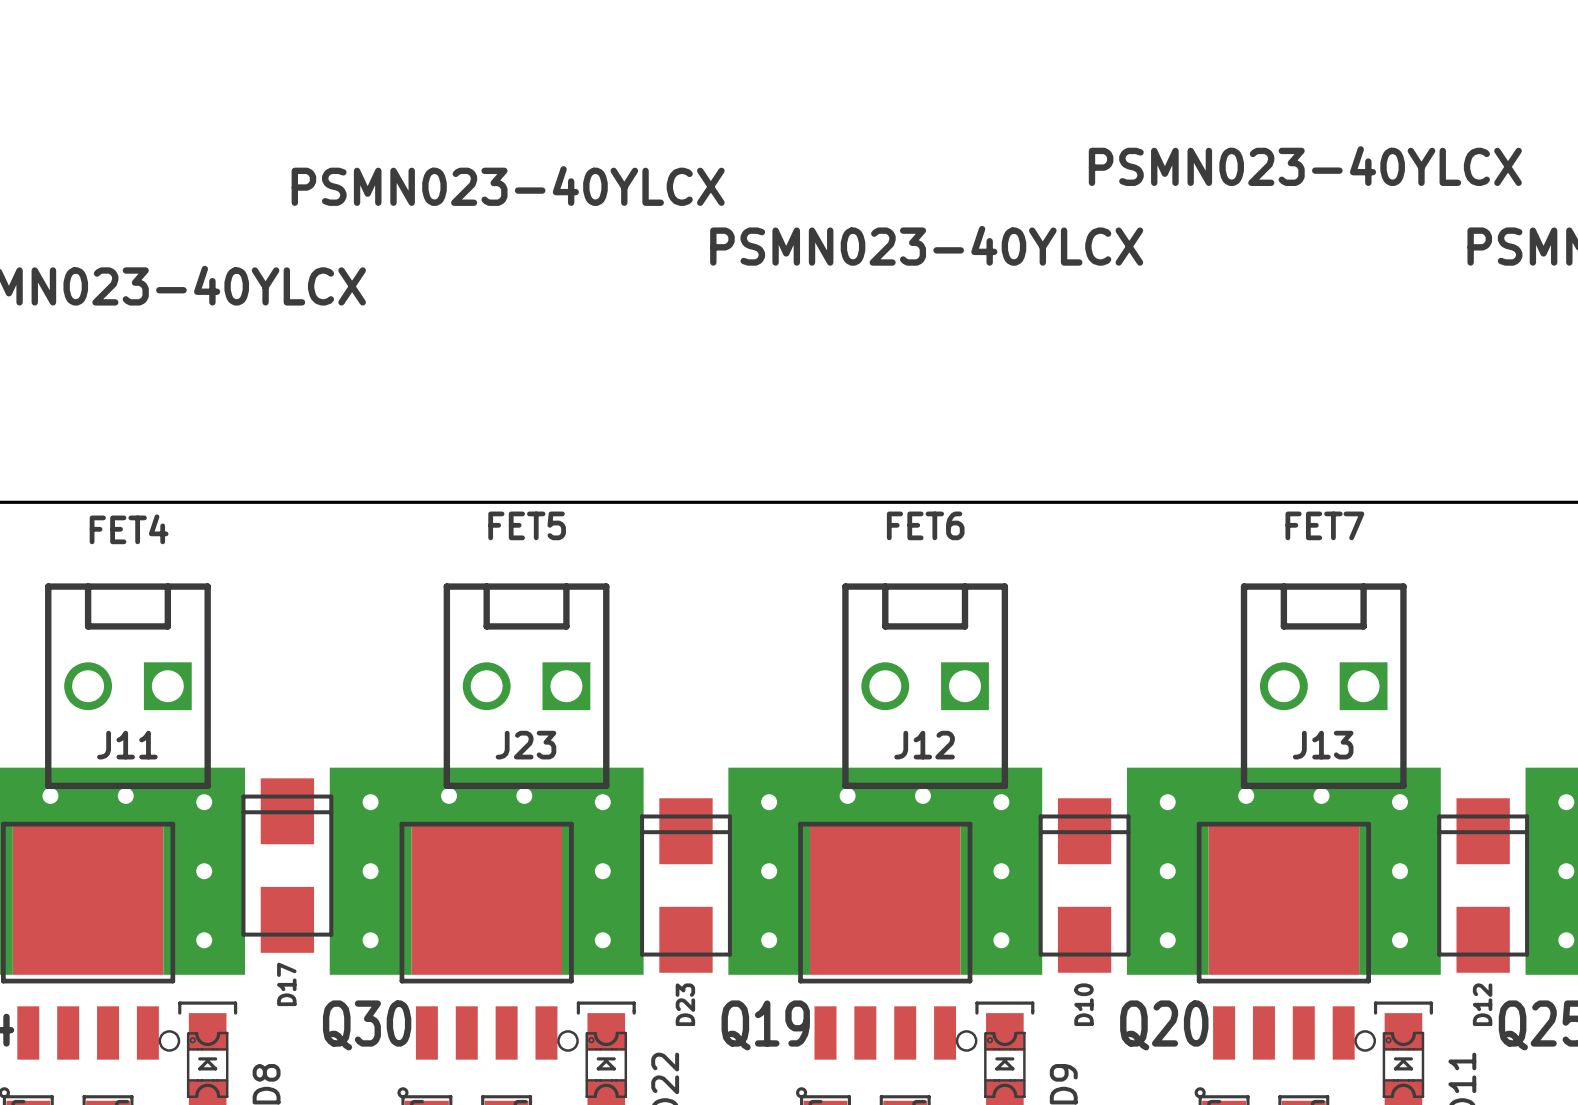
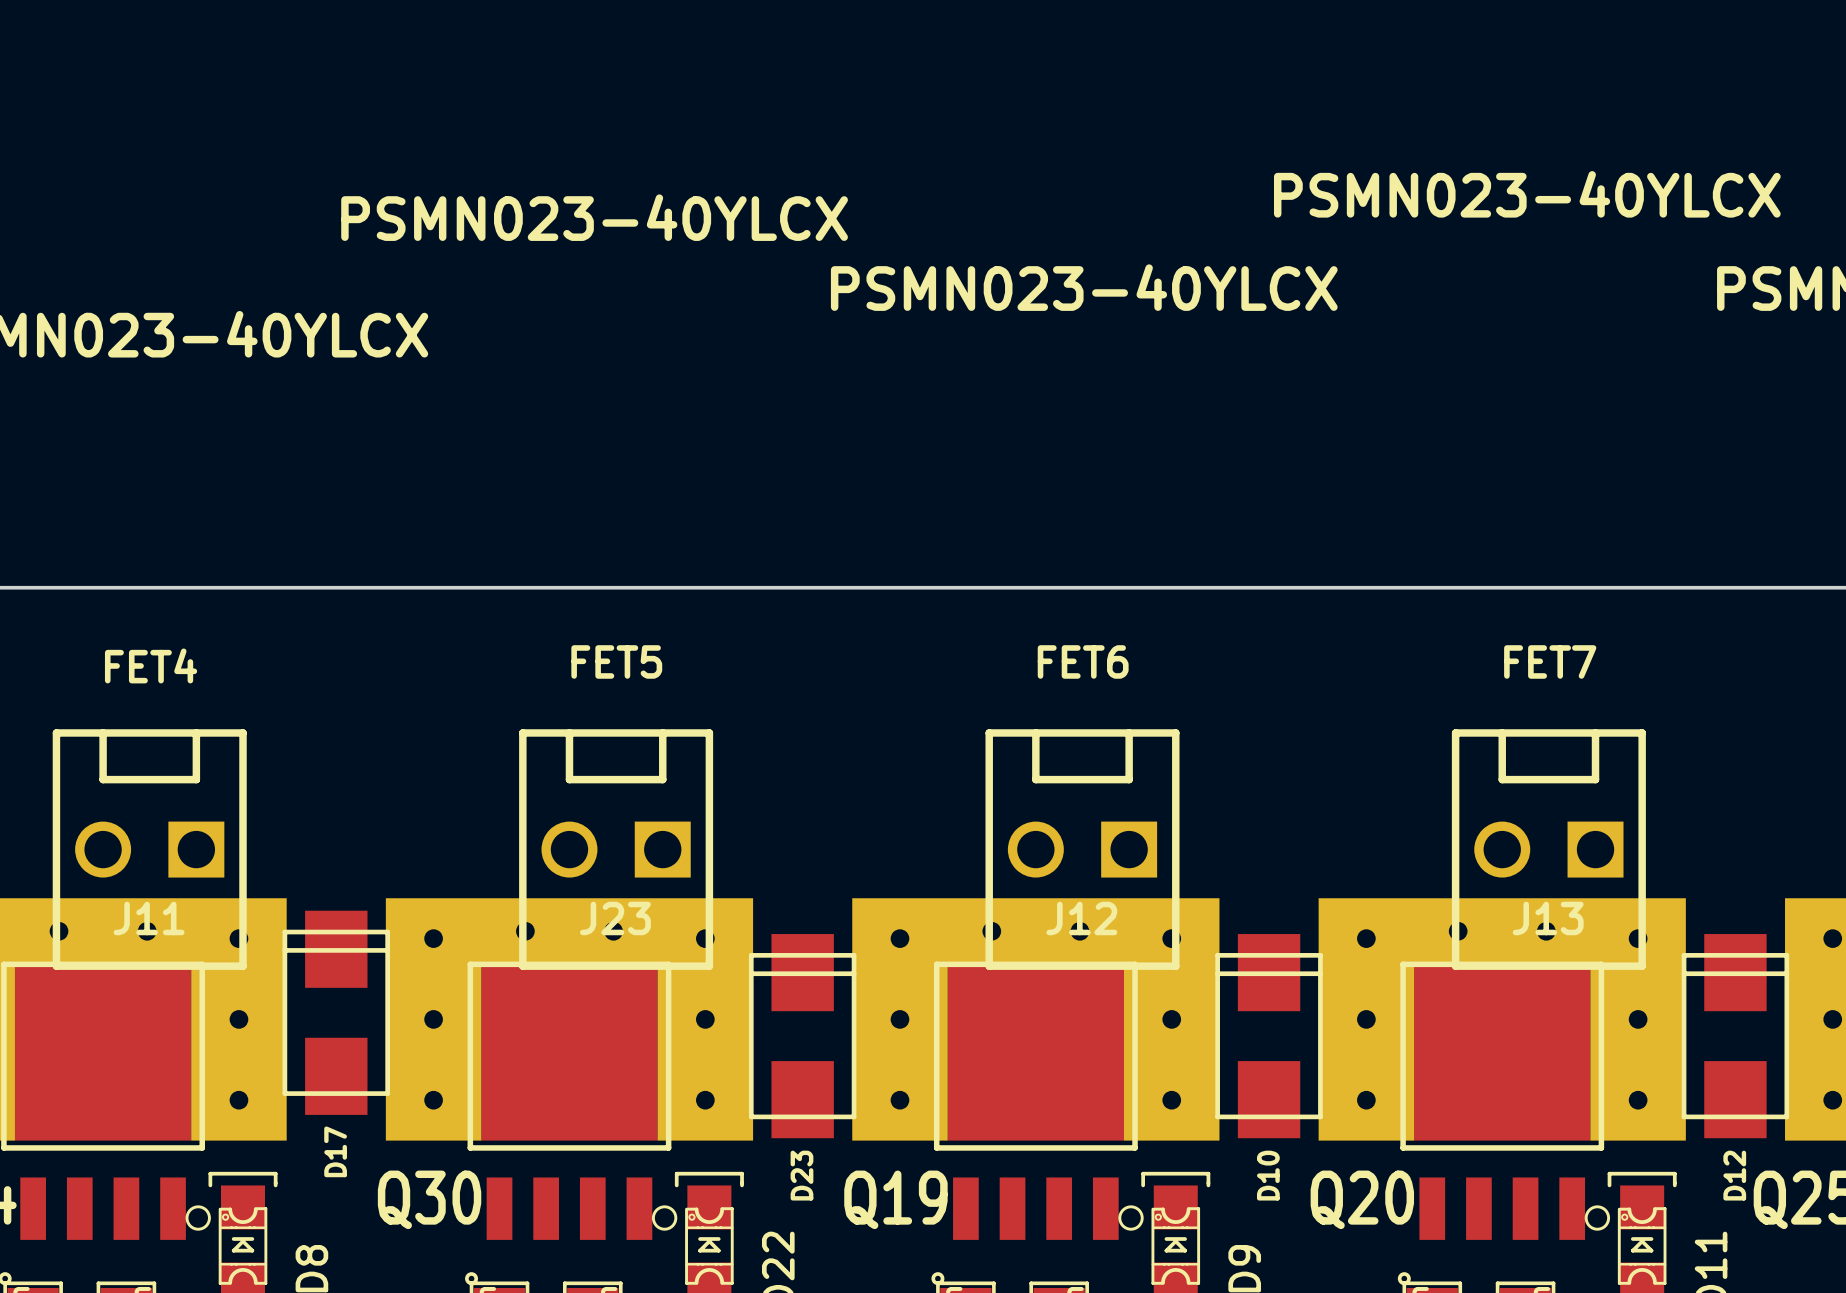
J11 position: (127, 686) -> (149, 849)
J23 position: (526, 686) -> (616, 849)
J12 position: (925, 686) -> (1082, 849)
J13 position: (1323, 686) -> (1548, 849)

